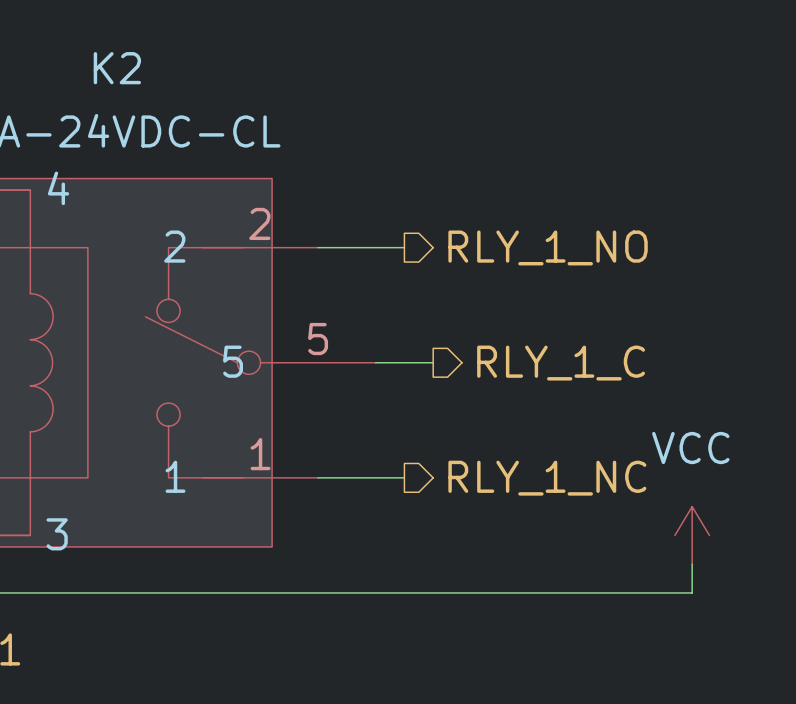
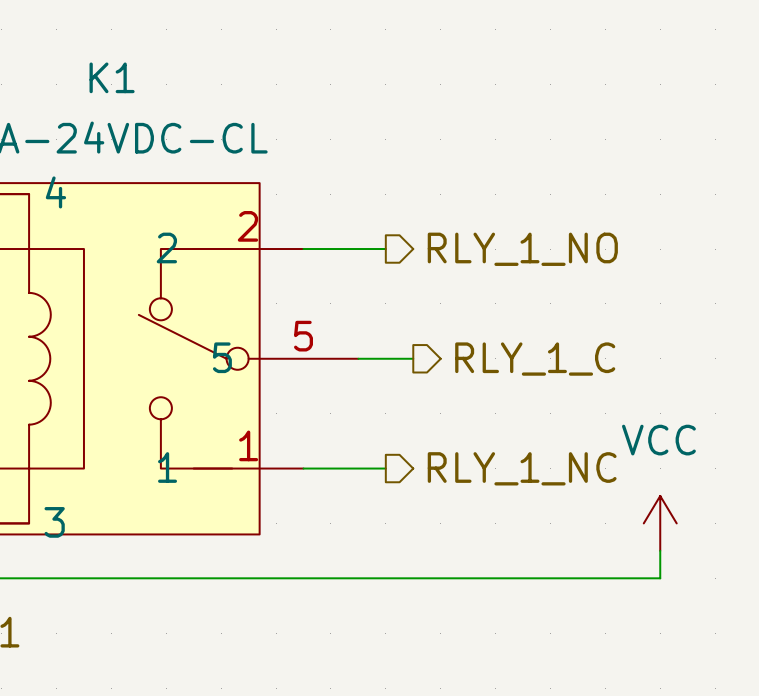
K2 name: K2 (117, 68) -> K1 (112, 77)

